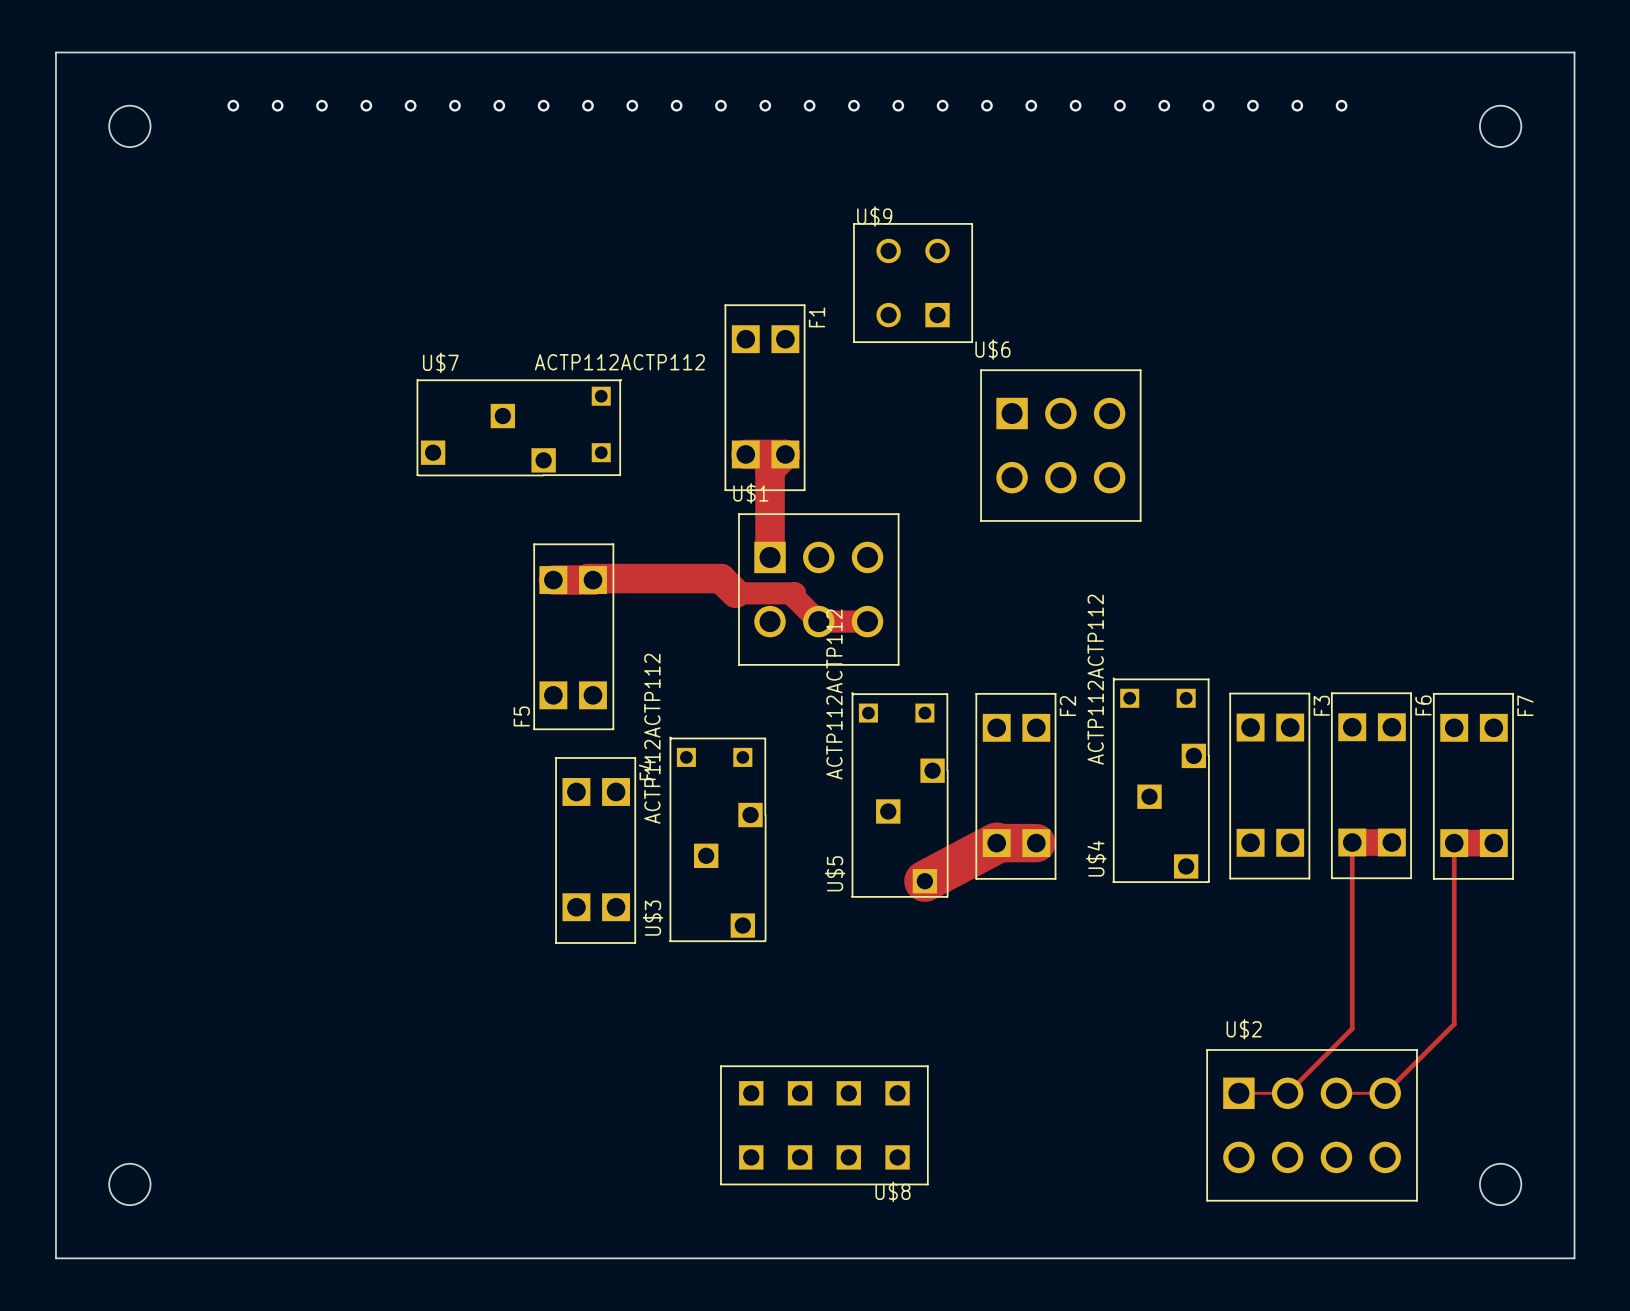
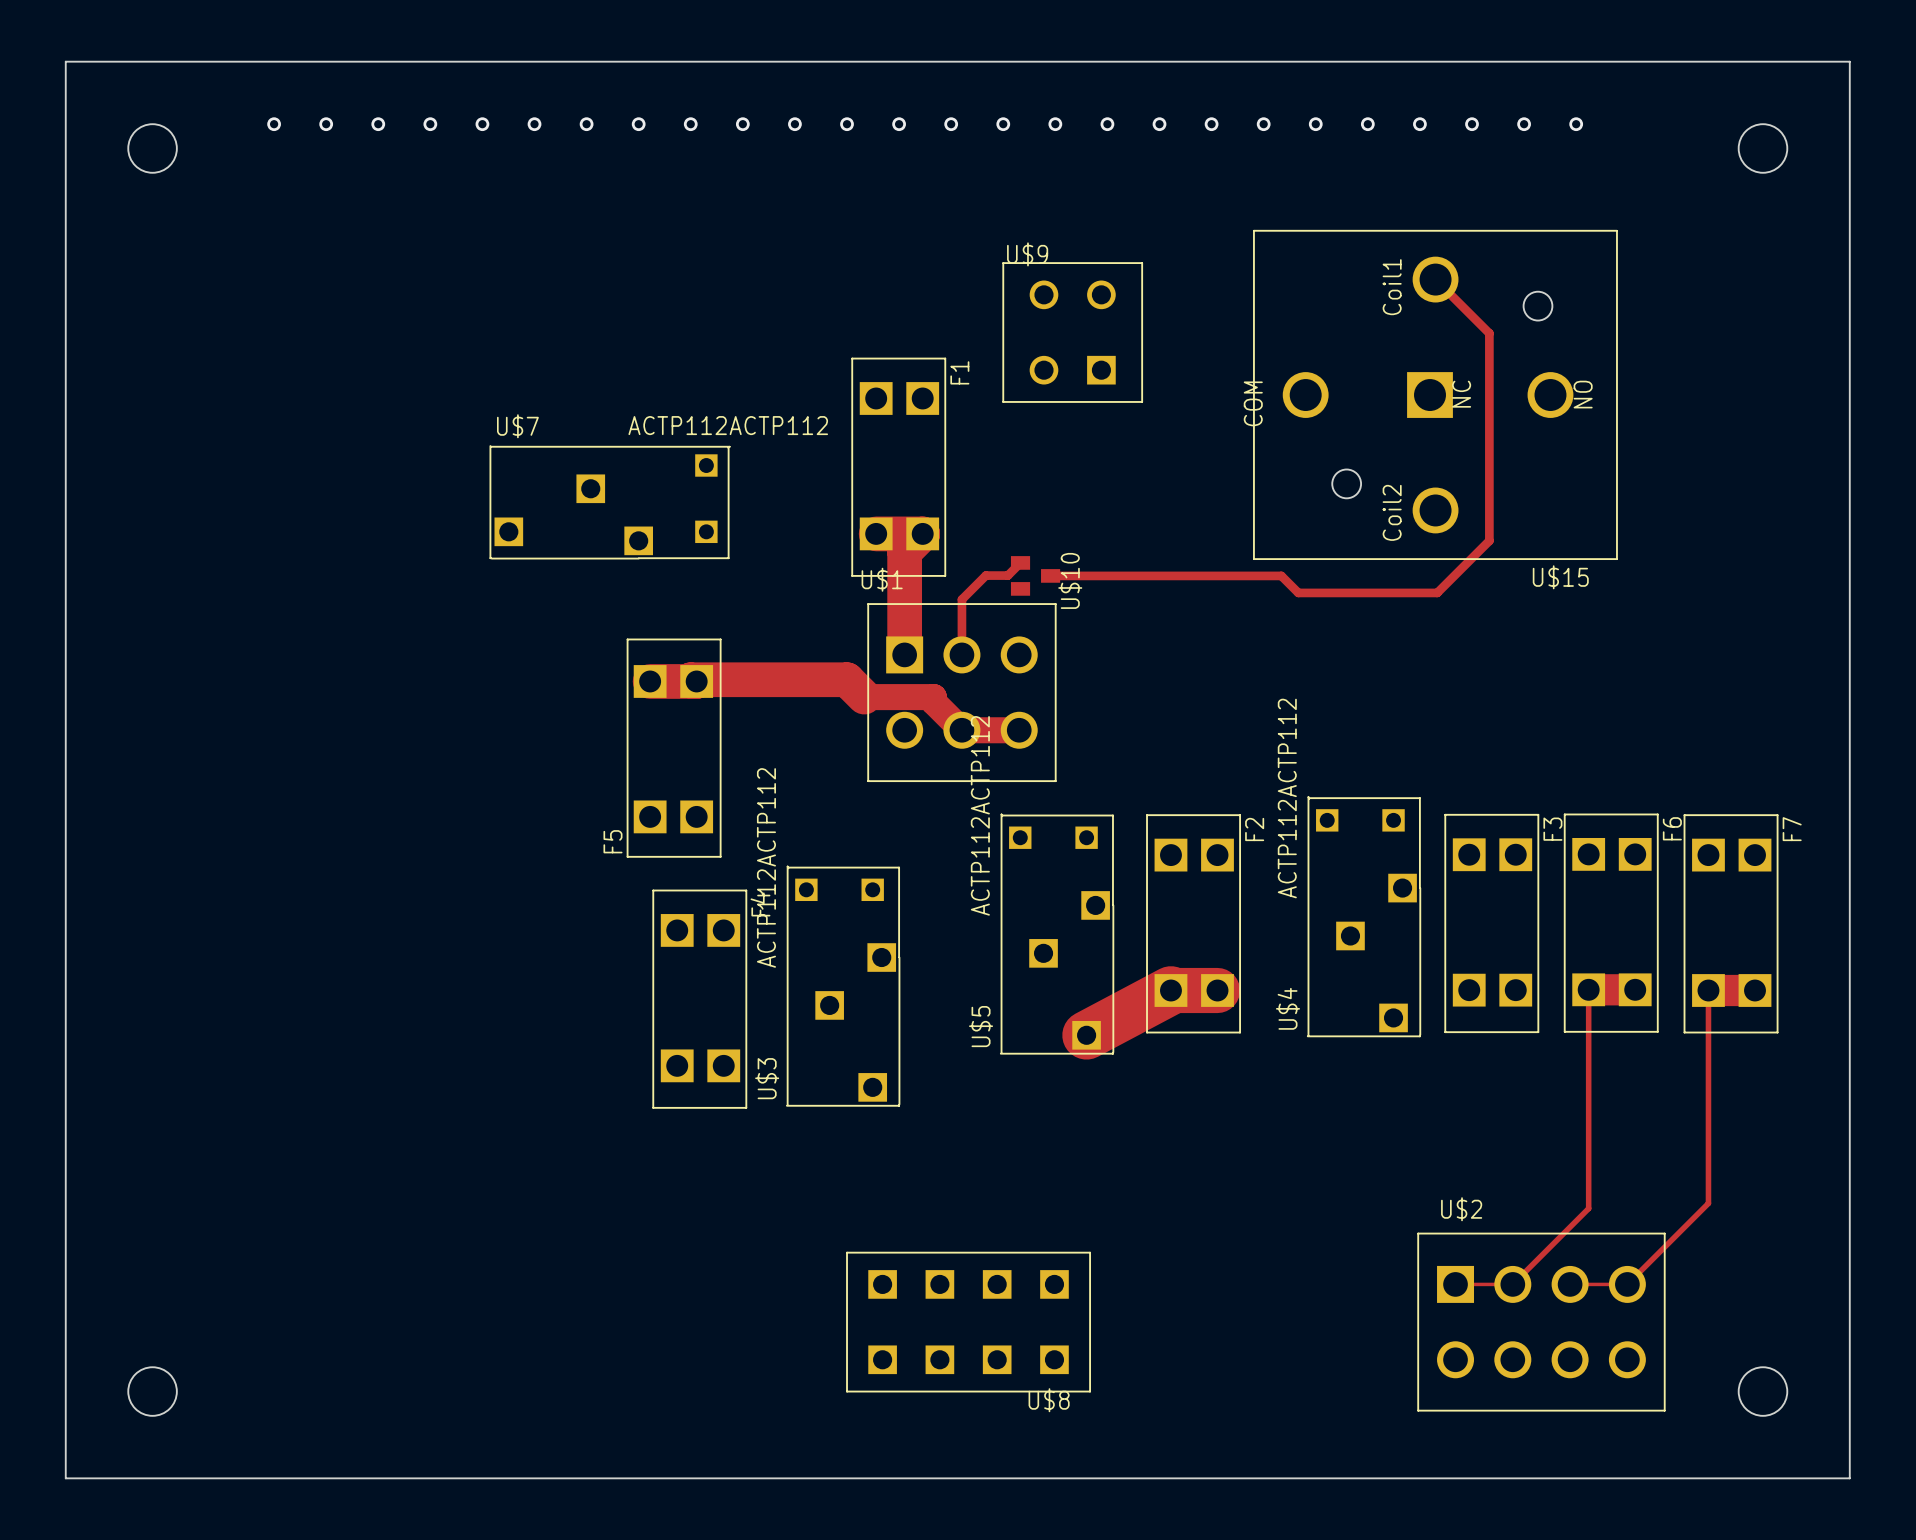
track: none -> (1435, 279) (1489, 333) (1489, 540) (1437, 592) (1298, 592) (1281, 575) (1050, 575)
U$15: none -> (1435, 394)
U$6: (1060, 445) -> none
track: none -> (1020, 562) (1007, 575) (985, 575) (961, 599) (961, 654)
U$10: none -> (1035, 575)

